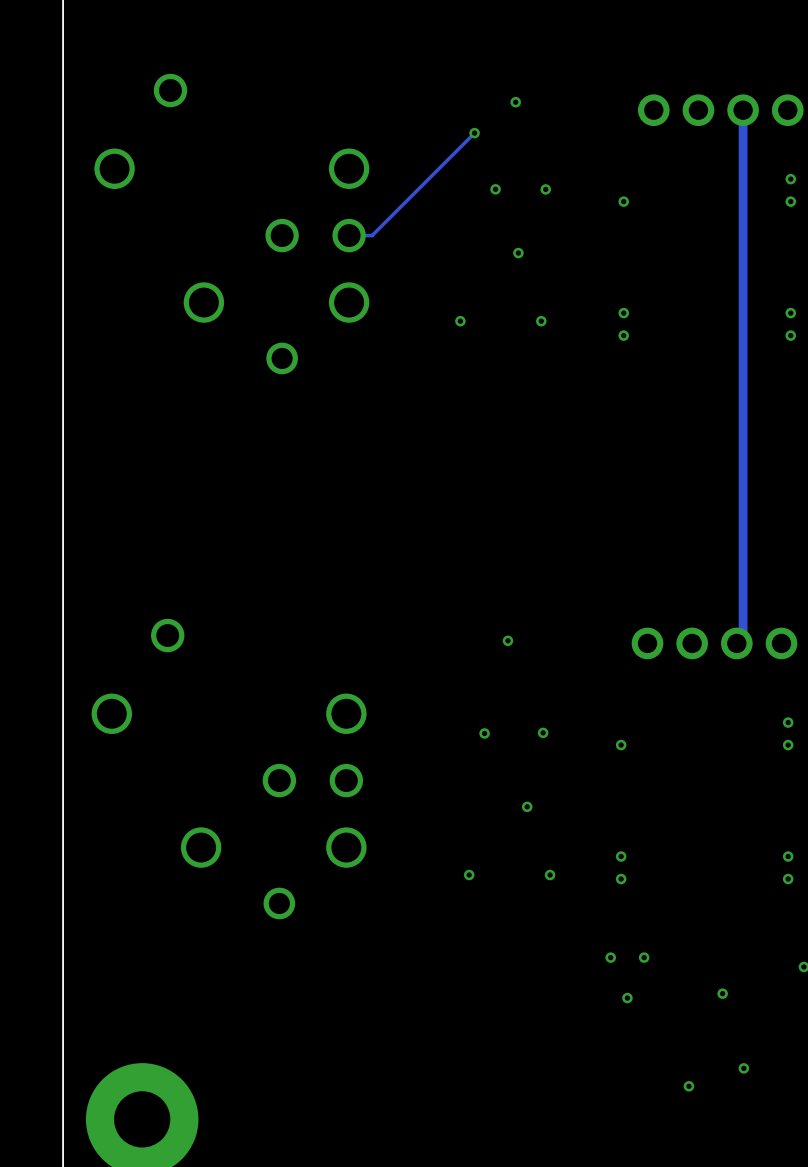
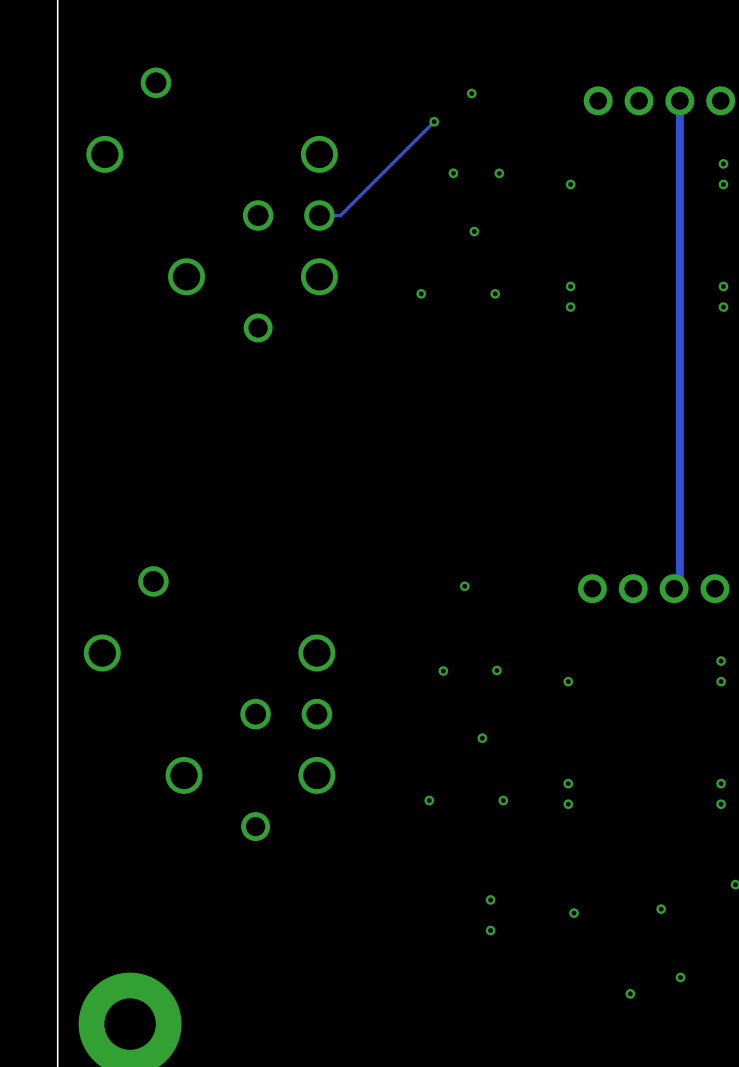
via: (610, 957) -> none
via: (644, 957) -> none
via: none -> (490, 899)
via: none -> (490, 930)

